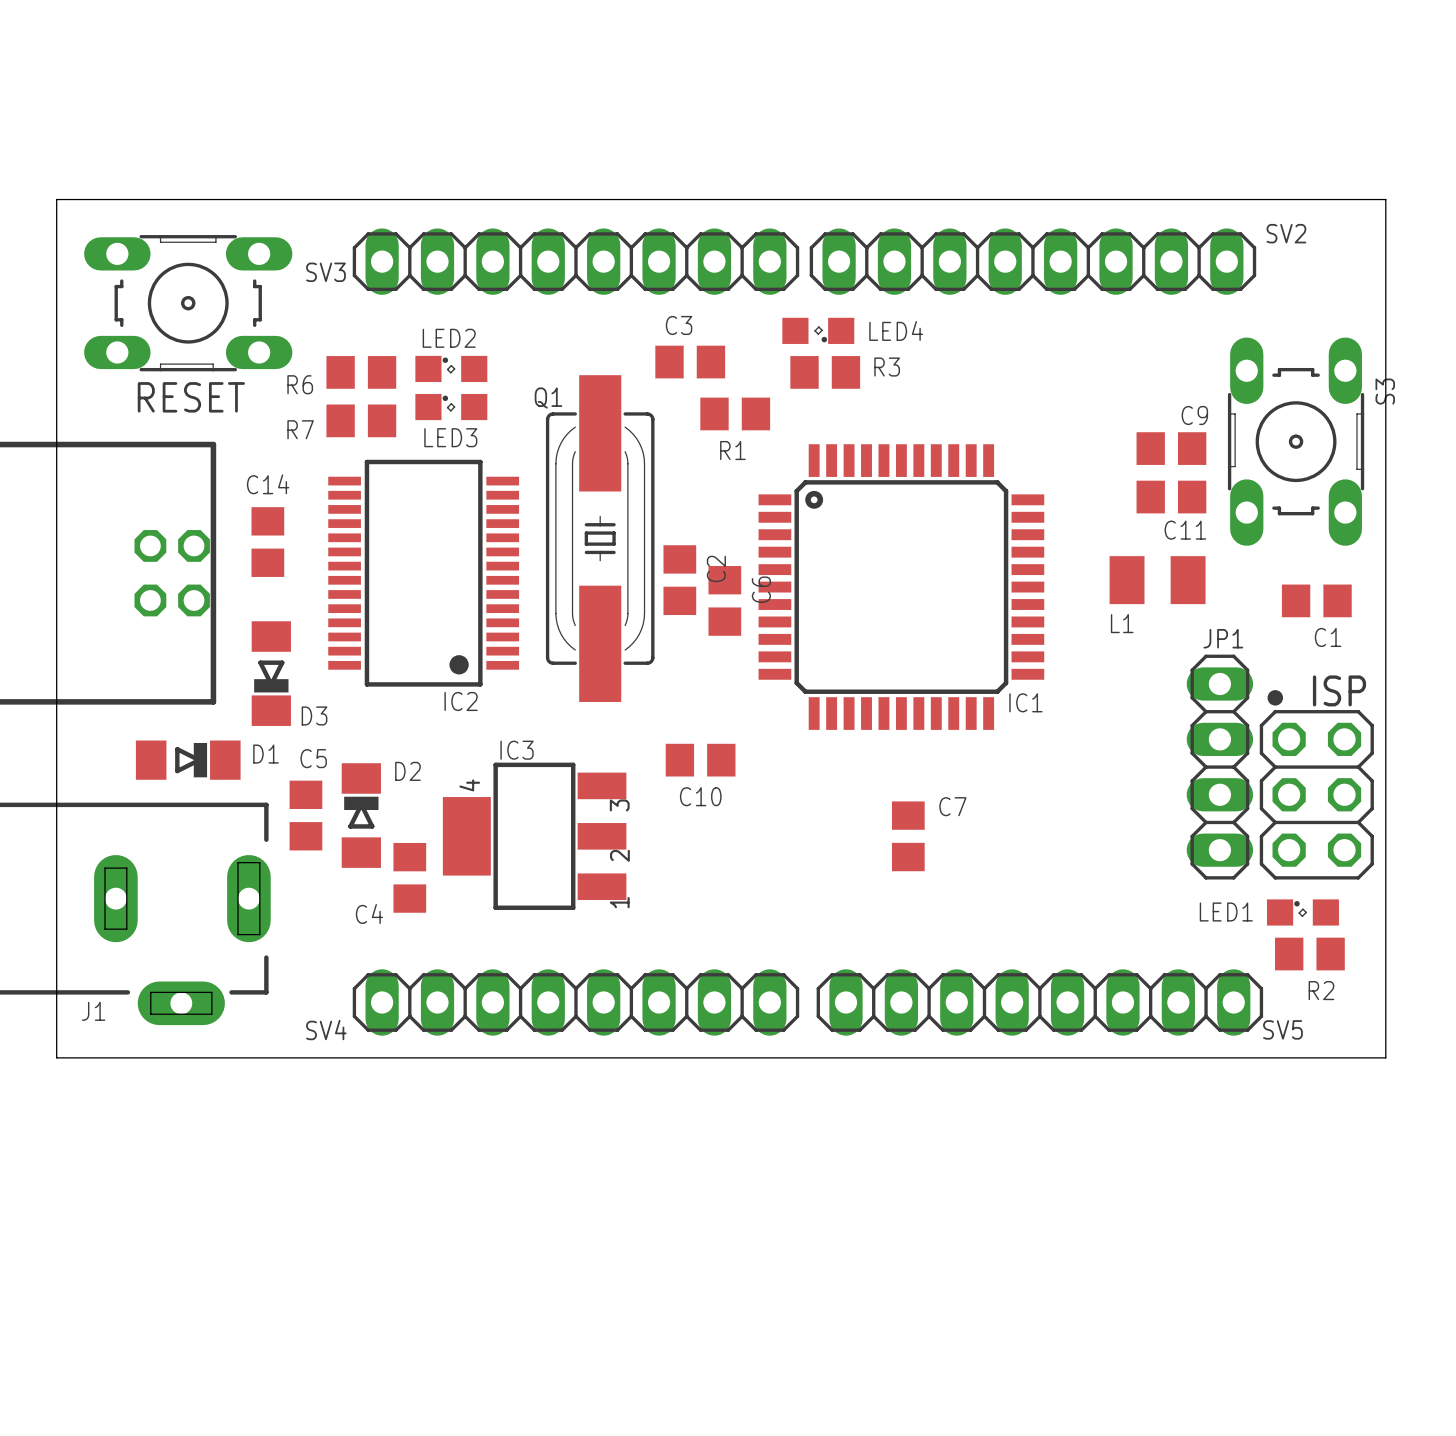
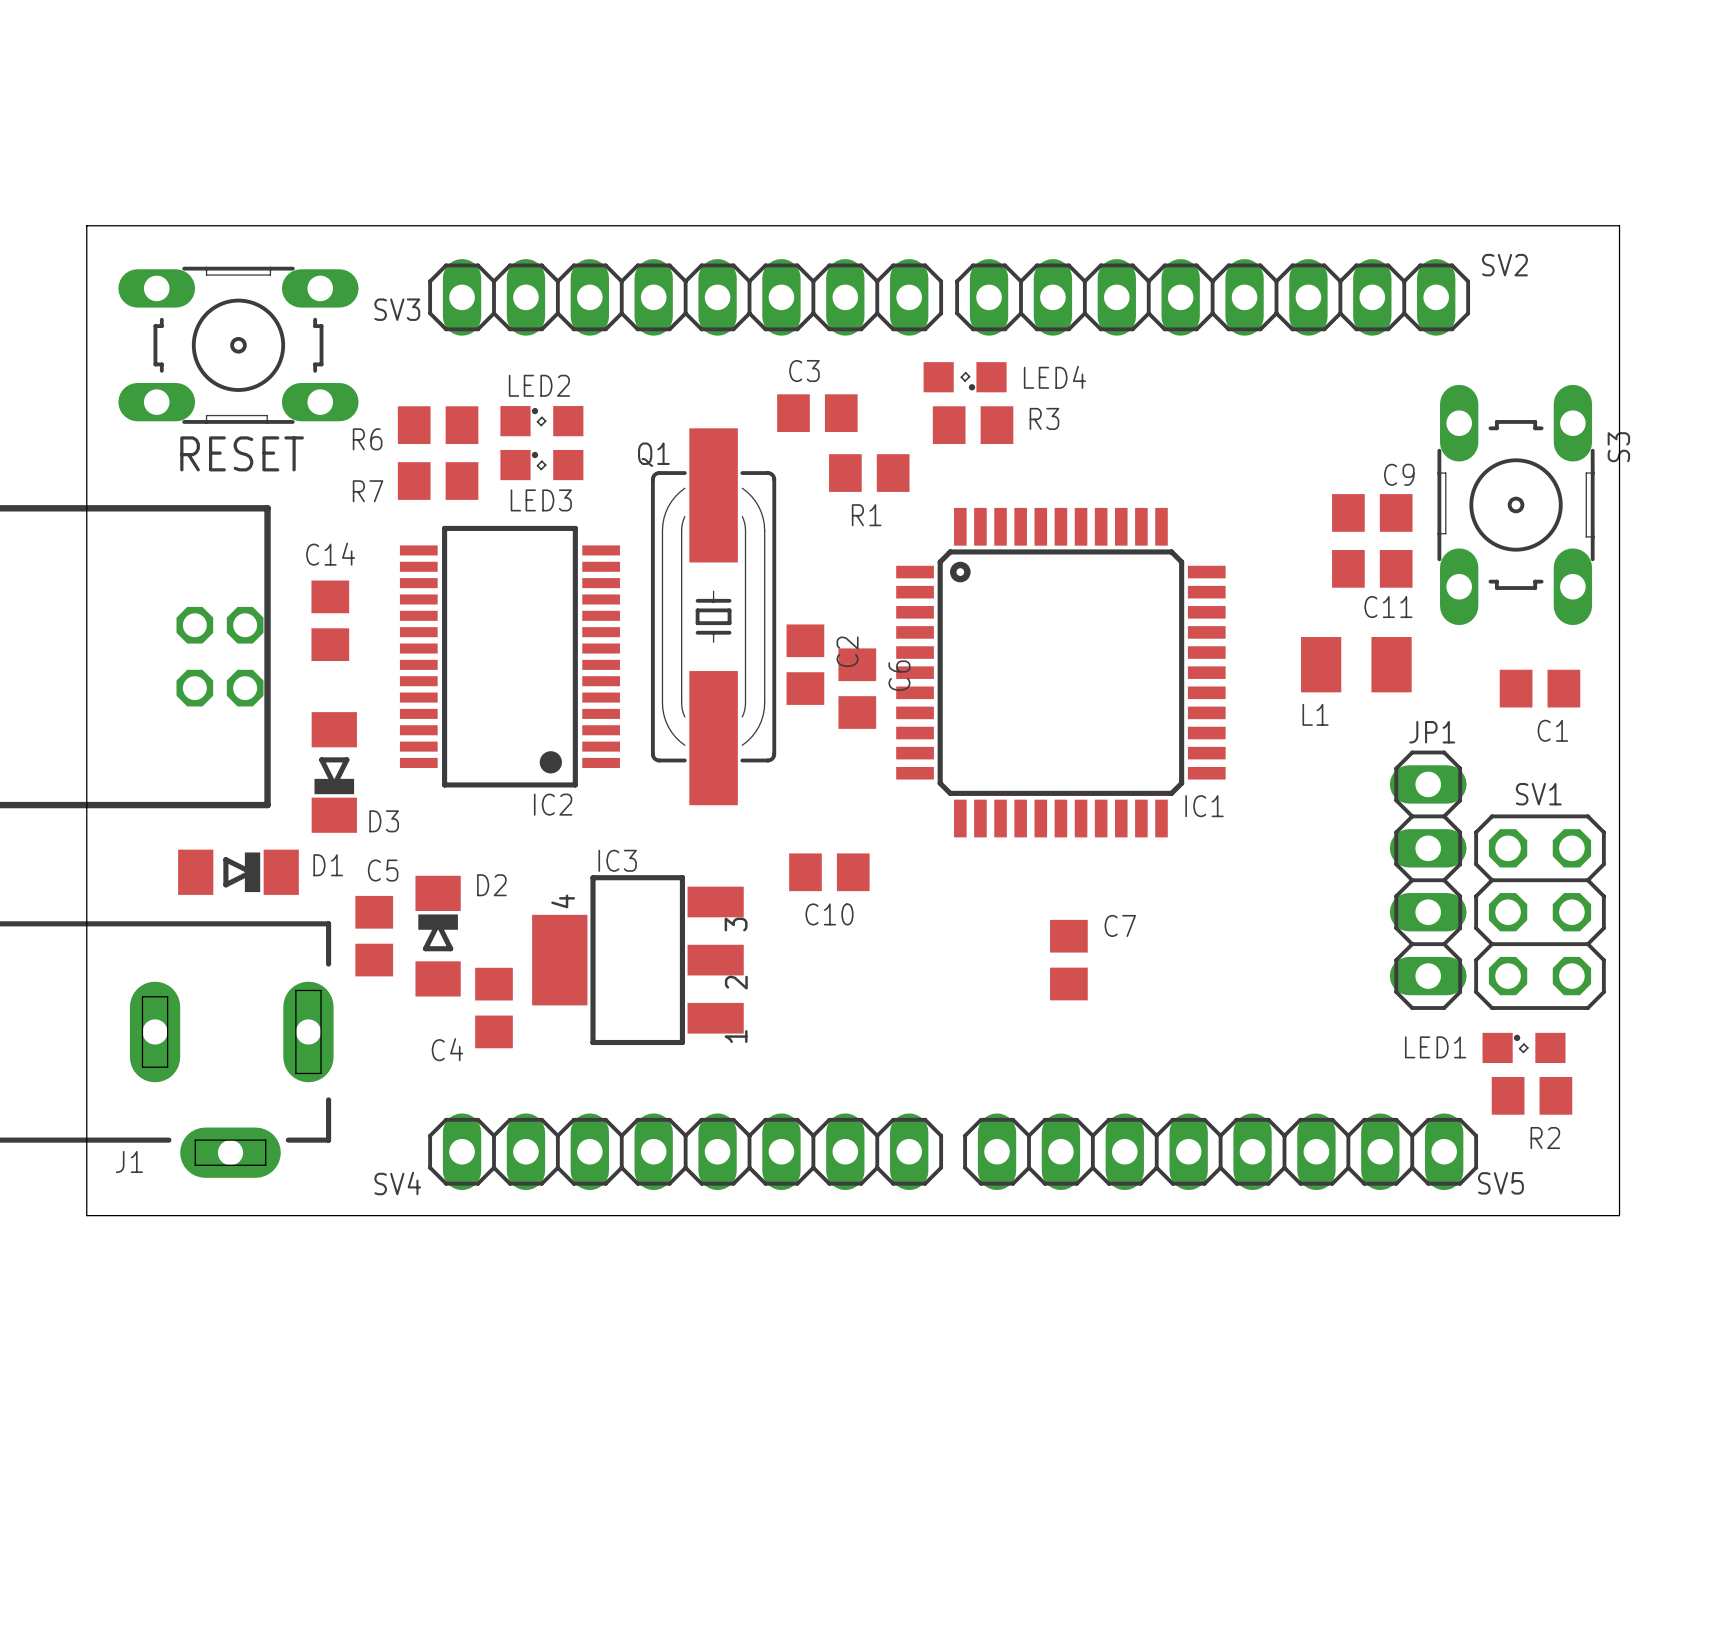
drawing: [1267, 690, 1284, 706] -> none
ISP name: ISP (1339, 690) -> SV1 (1538, 794)

